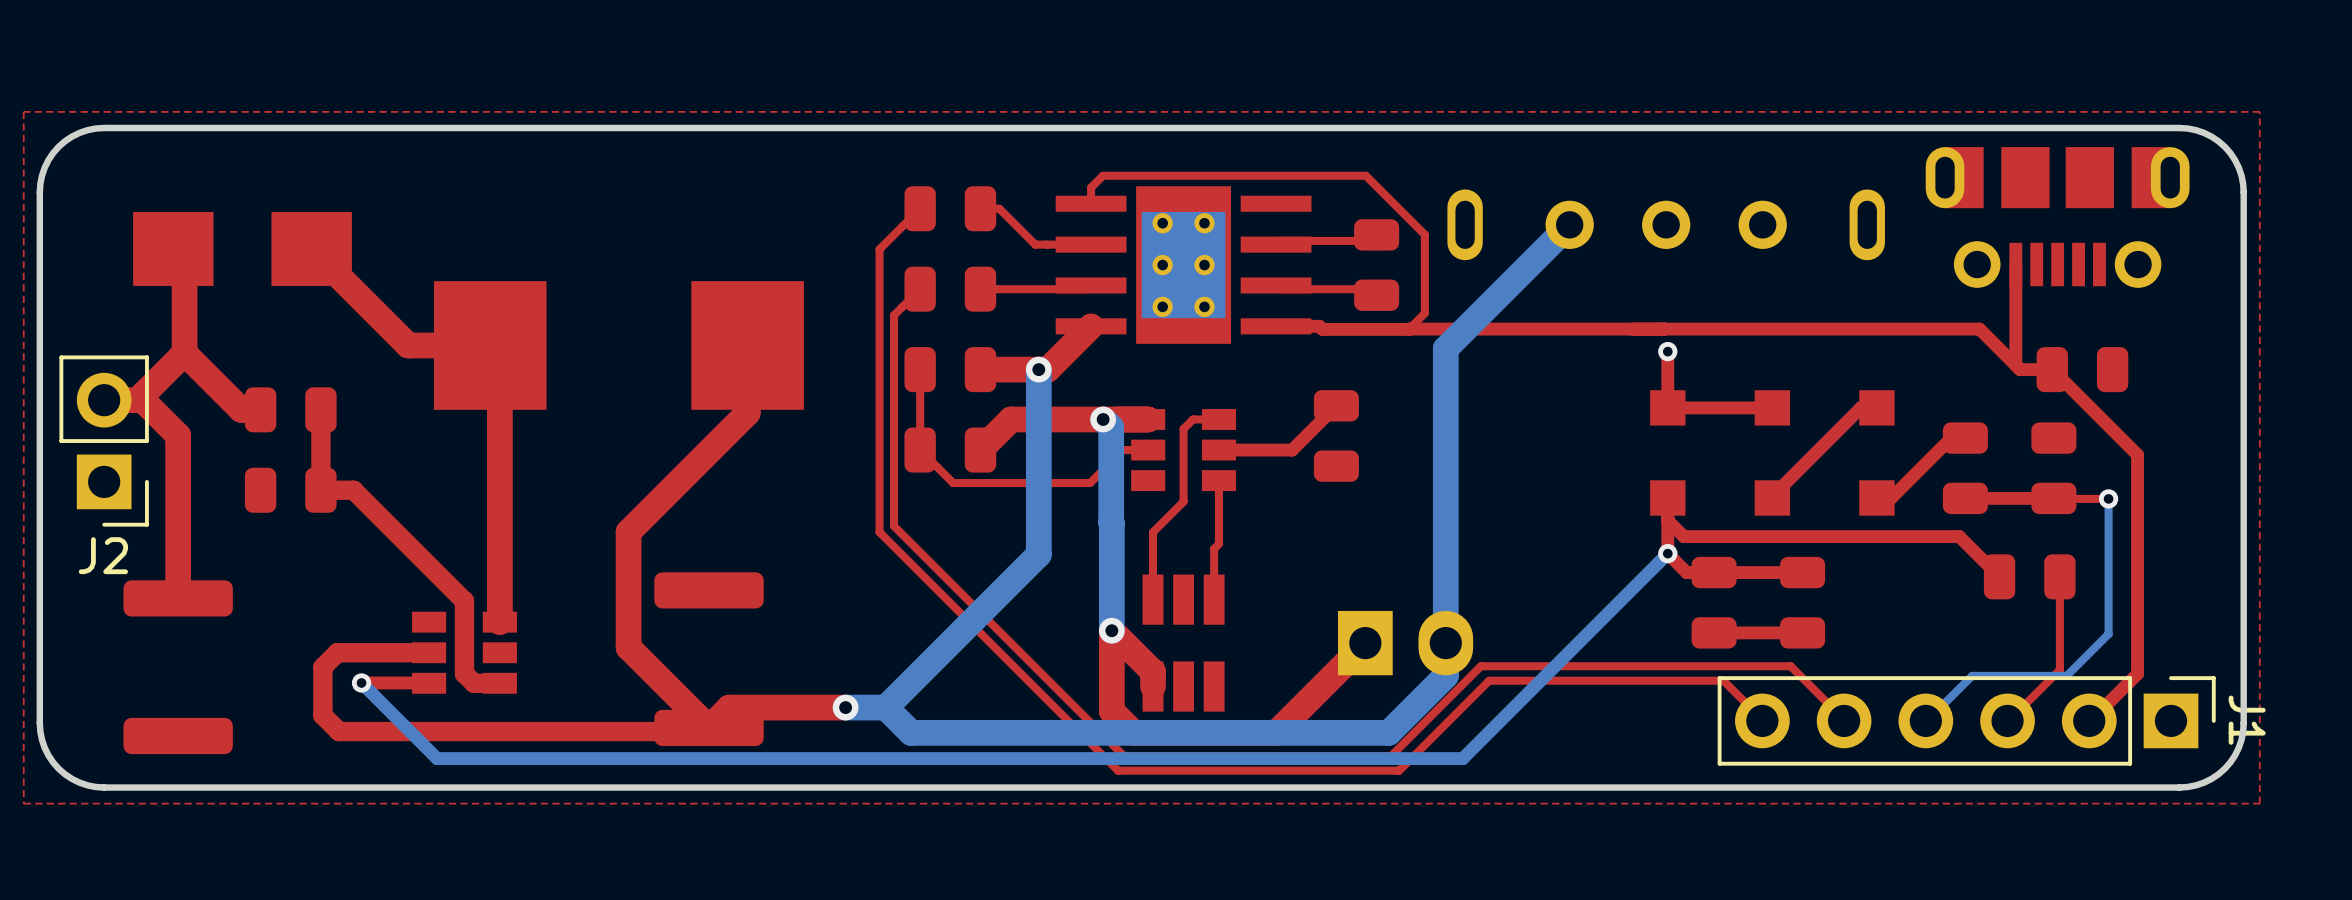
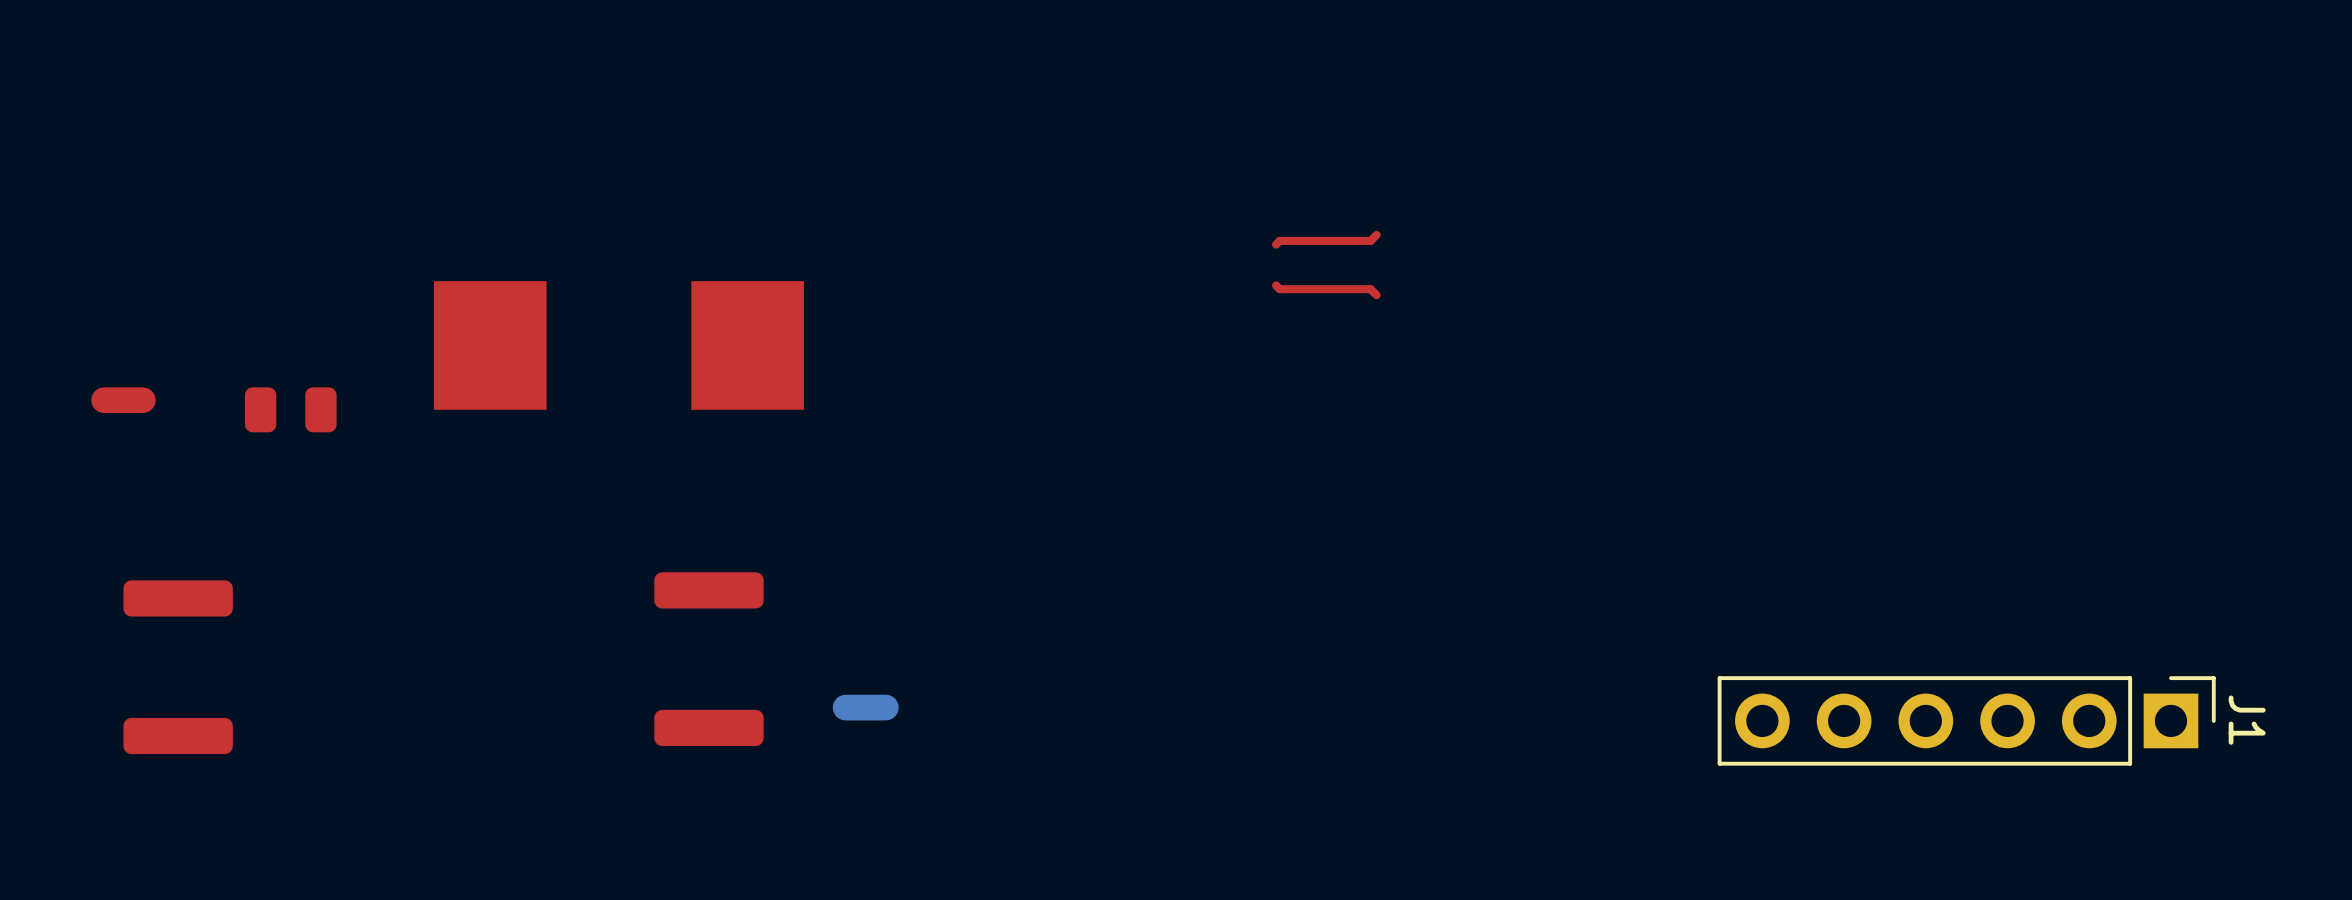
top zone outline: (2259, 111) (2259, 803) (23, 803) (23, 111) (2259, 111) -> none
board edge: (2179, 127) (104, 127) (87, 130) (71, 136) (58, 146) (44, 167) (40, 183) (39, 723) (42, 739) (53, 762) (64, 774) (79, 782) (104, 787) (2179, 787) (2196, 785) (2211, 778) (2224, 768) (2238, 747) (2243, 731) (2243, 192) (2238, 167) (2224, 146) (2203, 132) (2179, 127) -> none
top track: (1091, 203) (1091, 187) (1102, 175) (1365, 175) (1424, 234) (1424, 313) (1408, 329) (1322, 329) (1319, 326) (1276, 326) -> none
top track: (920, 208) (879, 249) (879, 532) (1118, 770) (1399, 770) (1489, 680) (1723, 680) (1763, 720) -> none
part: (950, 208) -> none
top track: (980, 208) (999, 208) (1035, 244) (1091, 244) -> none
part: (2057, 217) -> none
bottom track: (1569, 224) (1445, 348) (1445, 675) (1388, 732) (911, 732) (885, 707) (1038, 554) (1038, 369) -> none
part: (1666, 224) -> none
top track: (173, 248) (184, 260) (184, 353) -> none
part: (242, 248) -> none
top track: (311, 248) (408, 345) (467, 345) (499, 377) (499, 622) -> none
top track: (2015, 264) (2015, 365) -> none
part: (1183, 265) -> none
part: (1376, 265) -> none
top track: (1091, 285) (1087, 289) (980, 289) -> none
top track: (920, 289) (894, 315) (894, 526) (1124, 756) (1391, 756) (1480, 666) (1790, 666) (1845, 720) -> none
part: (950, 289) -> none
top track: (1091, 326) (1047, 369) (980, 369) -> none
top track: (1409, 329) (1979, 329) (2020, 369) (2052, 369) (2137, 454) (2137, 673) (2090, 720) -> none
top track: (747, 337) (747, 413) (628, 532) (628, 647) (709, 727) -> none
top track: (1667, 351) (1667, 407) (1772, 407) -> none
via: (1667, 351) -> none
top track: (184, 353) (241, 409) (260, 409) -> none
top track: (184, 353) (142, 394) (142, 400) (178, 435) (178, 598) -> none
top track: (920, 369) (920, 450) (953, 483) (1090, 483) (1123, 450) (1148, 450) -> none
part: (950, 369) -> none
via: (1038, 369) -> none
part: (2082, 369) -> none
top track: (1336, 405) (1292, 450) (1218, 450) -> none
top track: (1876, 407) (1860, 407) (1772, 497) -> none
top track: (320, 409) (320, 490) (353, 490) (464, 601) (464, 673) (473, 683) (499, 683) -> none
bottom track: (1103, 419) (1111, 427) (1111, 630) -> none
via: (1103, 419) -> none
top track: (1148, 419) (1011, 419) (980, 450) -> none
top track: (1218, 419) (1193, 419) (1183, 428) (1183, 501) (1153, 532) (1153, 599) -> none
part: (1336, 435) -> none
top track: (1965, 438) (1951, 438) (1891, 497) (1876, 497) -> none
J2: (104, 441) -> none
part: (950, 450) -> none
part: (1183, 450) -> none
part: (1667, 452) -> none
part: (1772, 452) -> none
part: (1876, 452) -> none
part: (1965, 468) -> none
part: (2053, 468) -> none
top track: (1218, 482) (1218, 543) (1214, 548) (1214, 599) -> none
part: (290, 490) -> none
top track: (1667, 497) (1667, 553) (1686, 572) (1802, 572) -> none
top track: (1965, 498) (2108, 498) -> none
bottom track: (2108, 498) (2108, 634) (2066, 675) (1972, 675) (1927, 720) -> none
via: (2108, 498) -> none
top track: (1667, 520) (1683, 536) (1959, 536) (1999, 576) -> none
bottom track: (1667, 553) (1462, 758) (437, 758) (361, 682) -> none
via: (1667, 553) -> none
part: (2029, 576) -> none
top track: (2059, 576) (2059, 669) (2008, 720) -> none
part: (1714, 602) -> none
part: (1802, 602) -> none
via: (1111, 630) -> none
top track: (1802, 632) (1714, 632) -> none
part: (1183, 643) -> none
top track: (1365, 643) (1276, 732) (1133, 732) (1111, 710) (1111, 630) (1153, 671) (1153, 686) -> none
part: (1405, 643) -> none
top track: (429, 652) (337, 652) (322, 667) (322, 715) (339, 731) (705, 731) (709, 727) -> none
part: (464, 652) -> none
via: (361, 682) -> none
top track: (428, 682) (361, 682) -> none
top track: (845, 707) (729, 707) (709, 727) -> none
via: (845, 707) -> none

